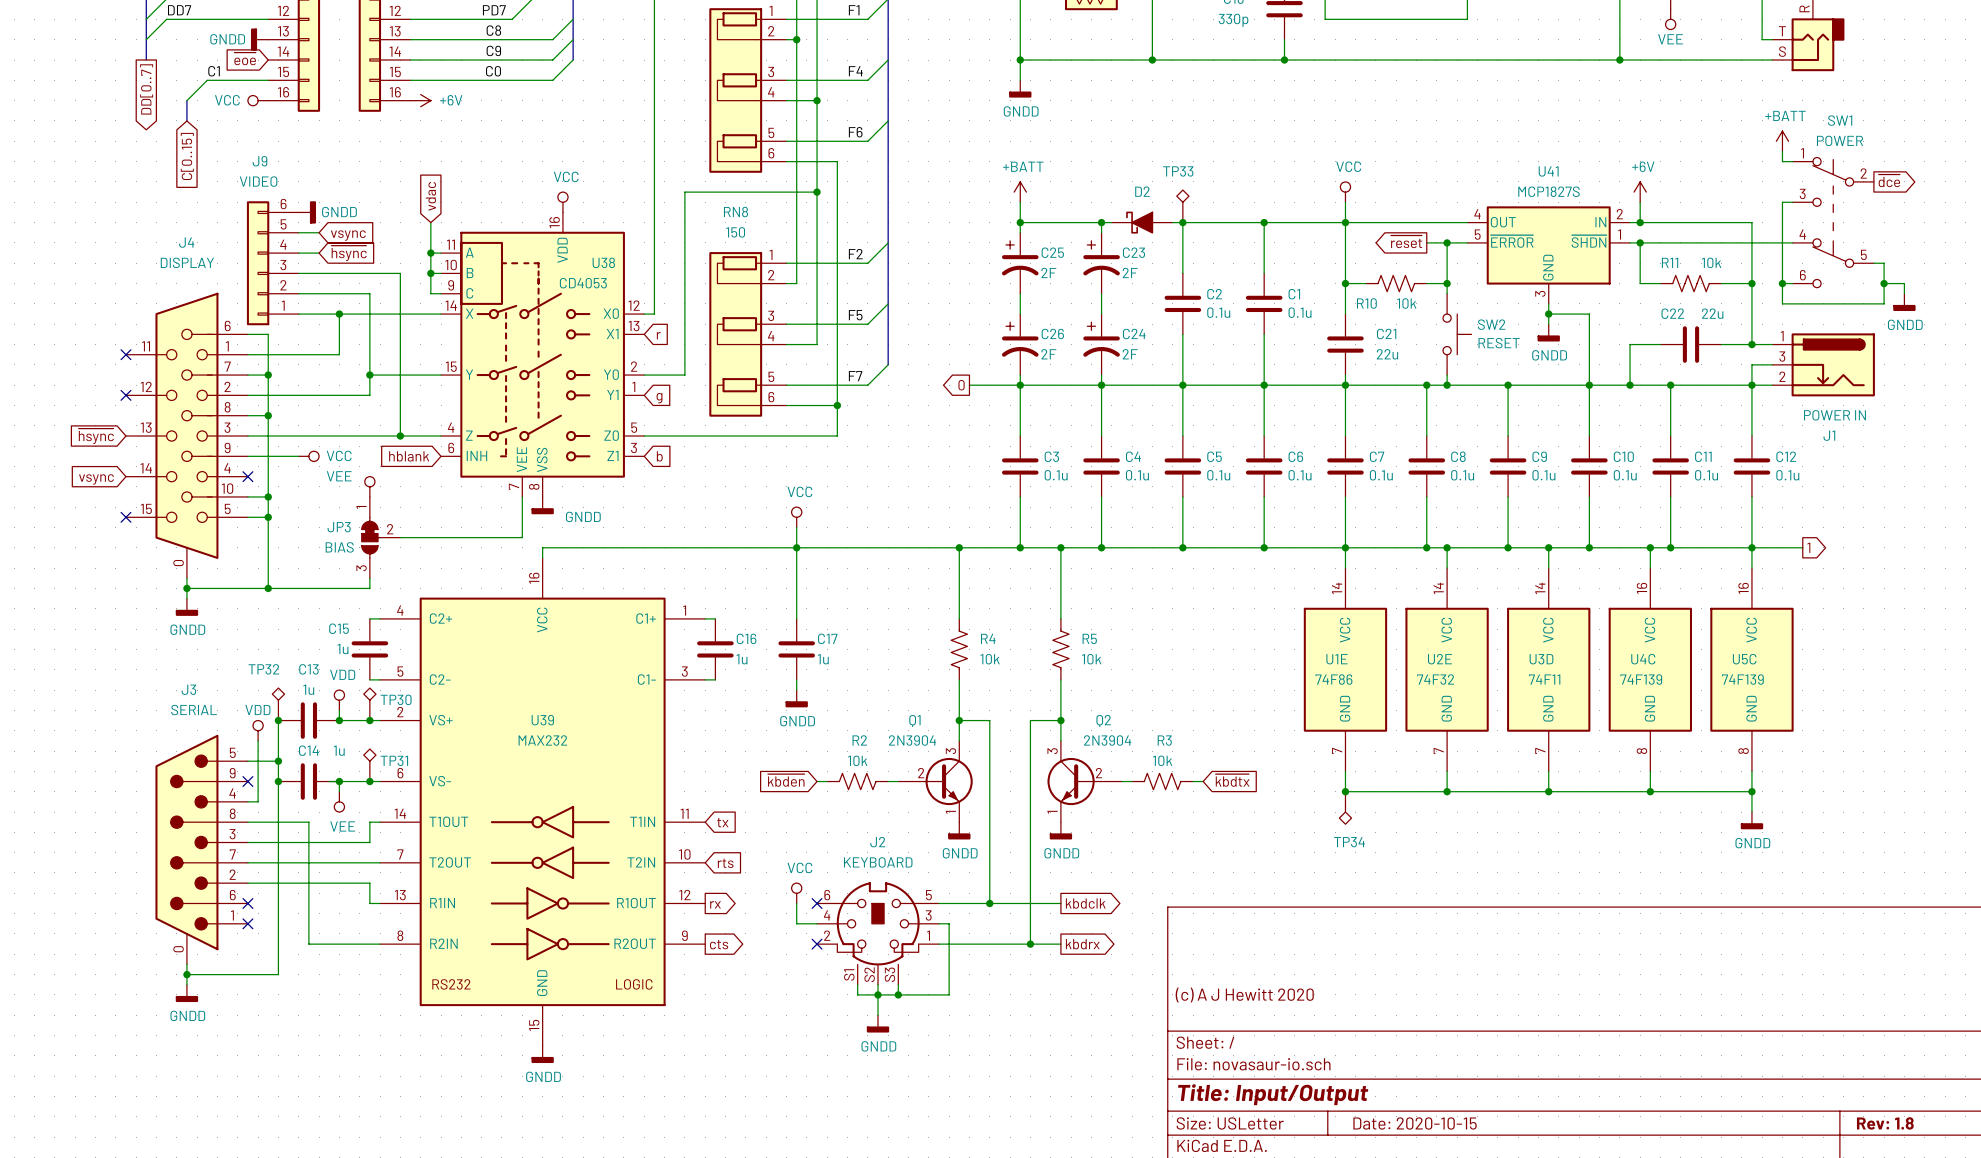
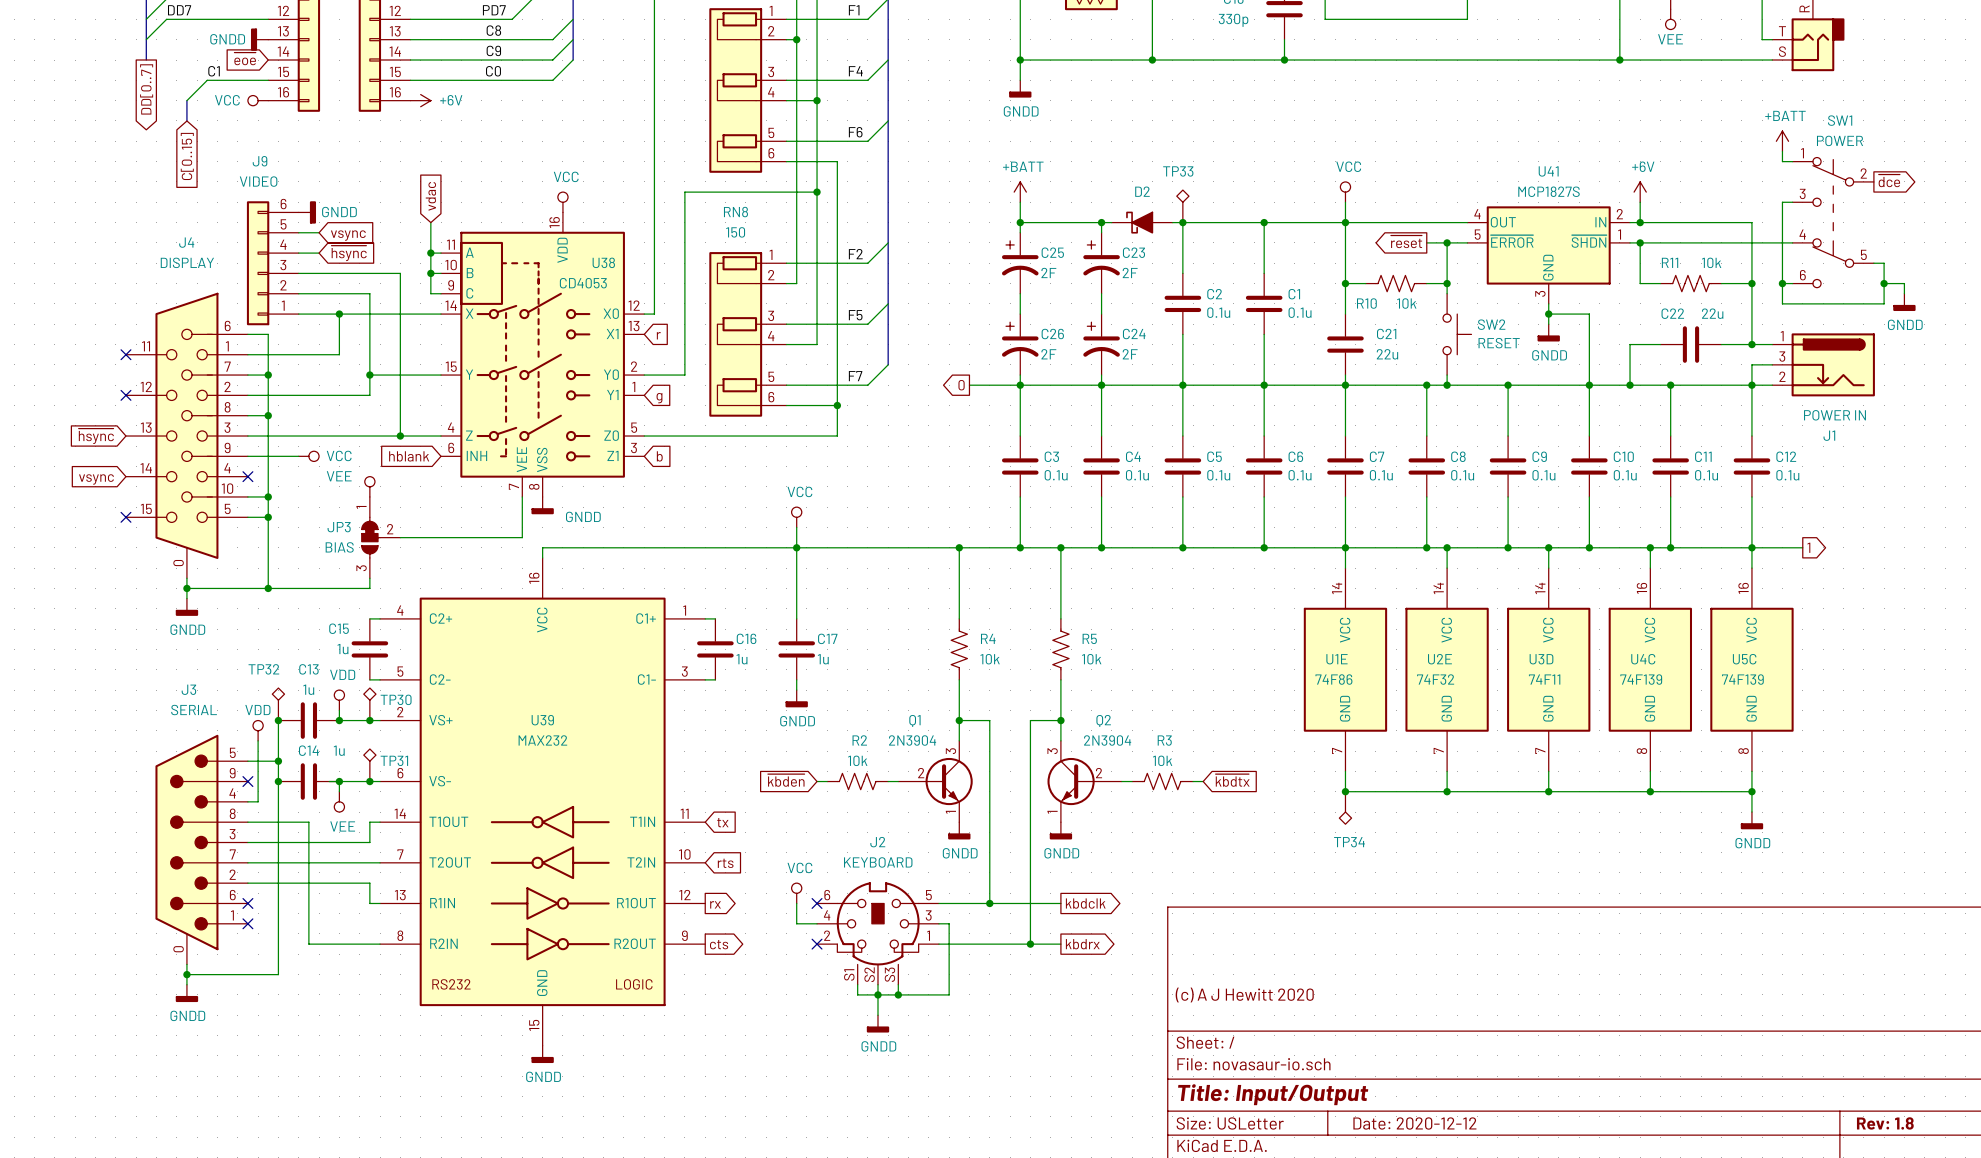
title block: Date: 2020-10-15 (1415, 1123) -> Date: 2020-12-12 (1414, 1123)

